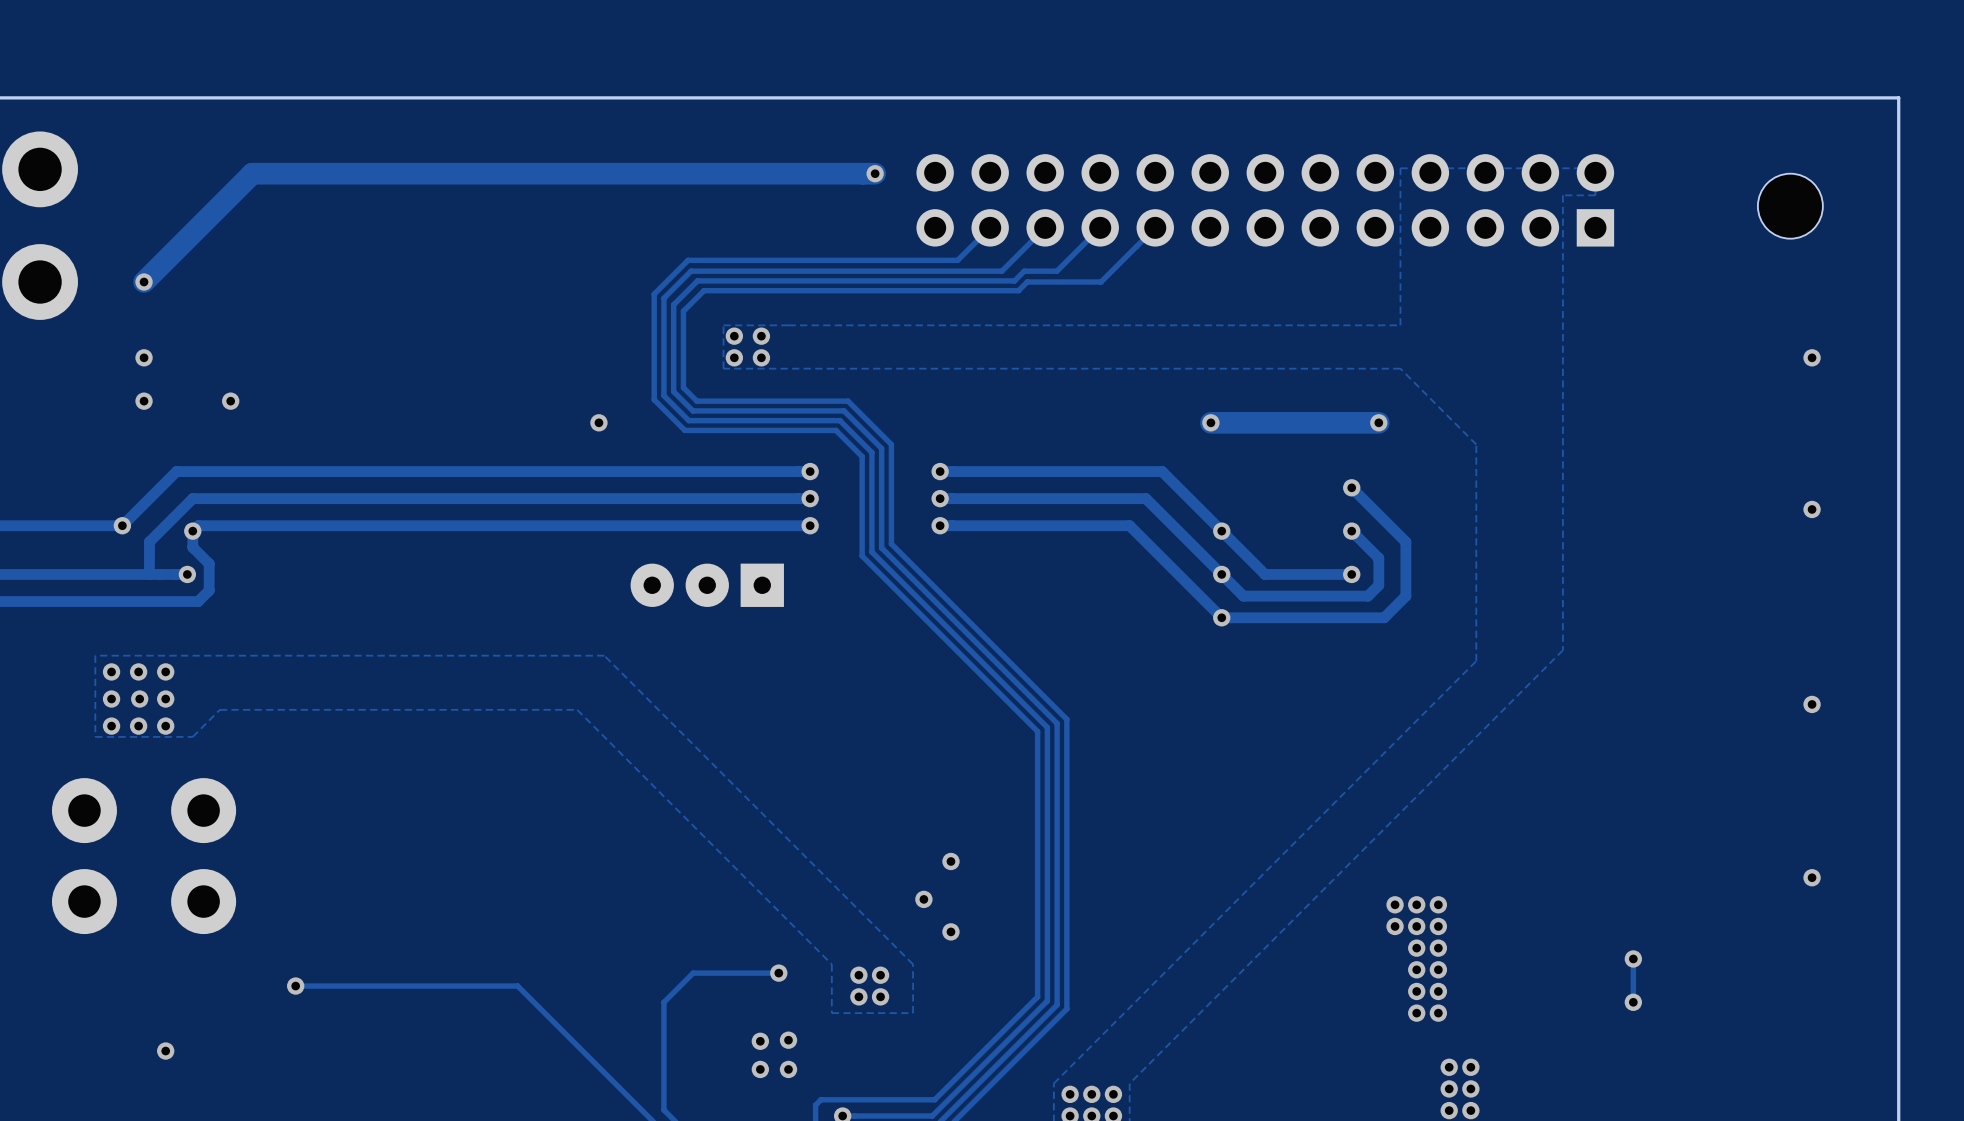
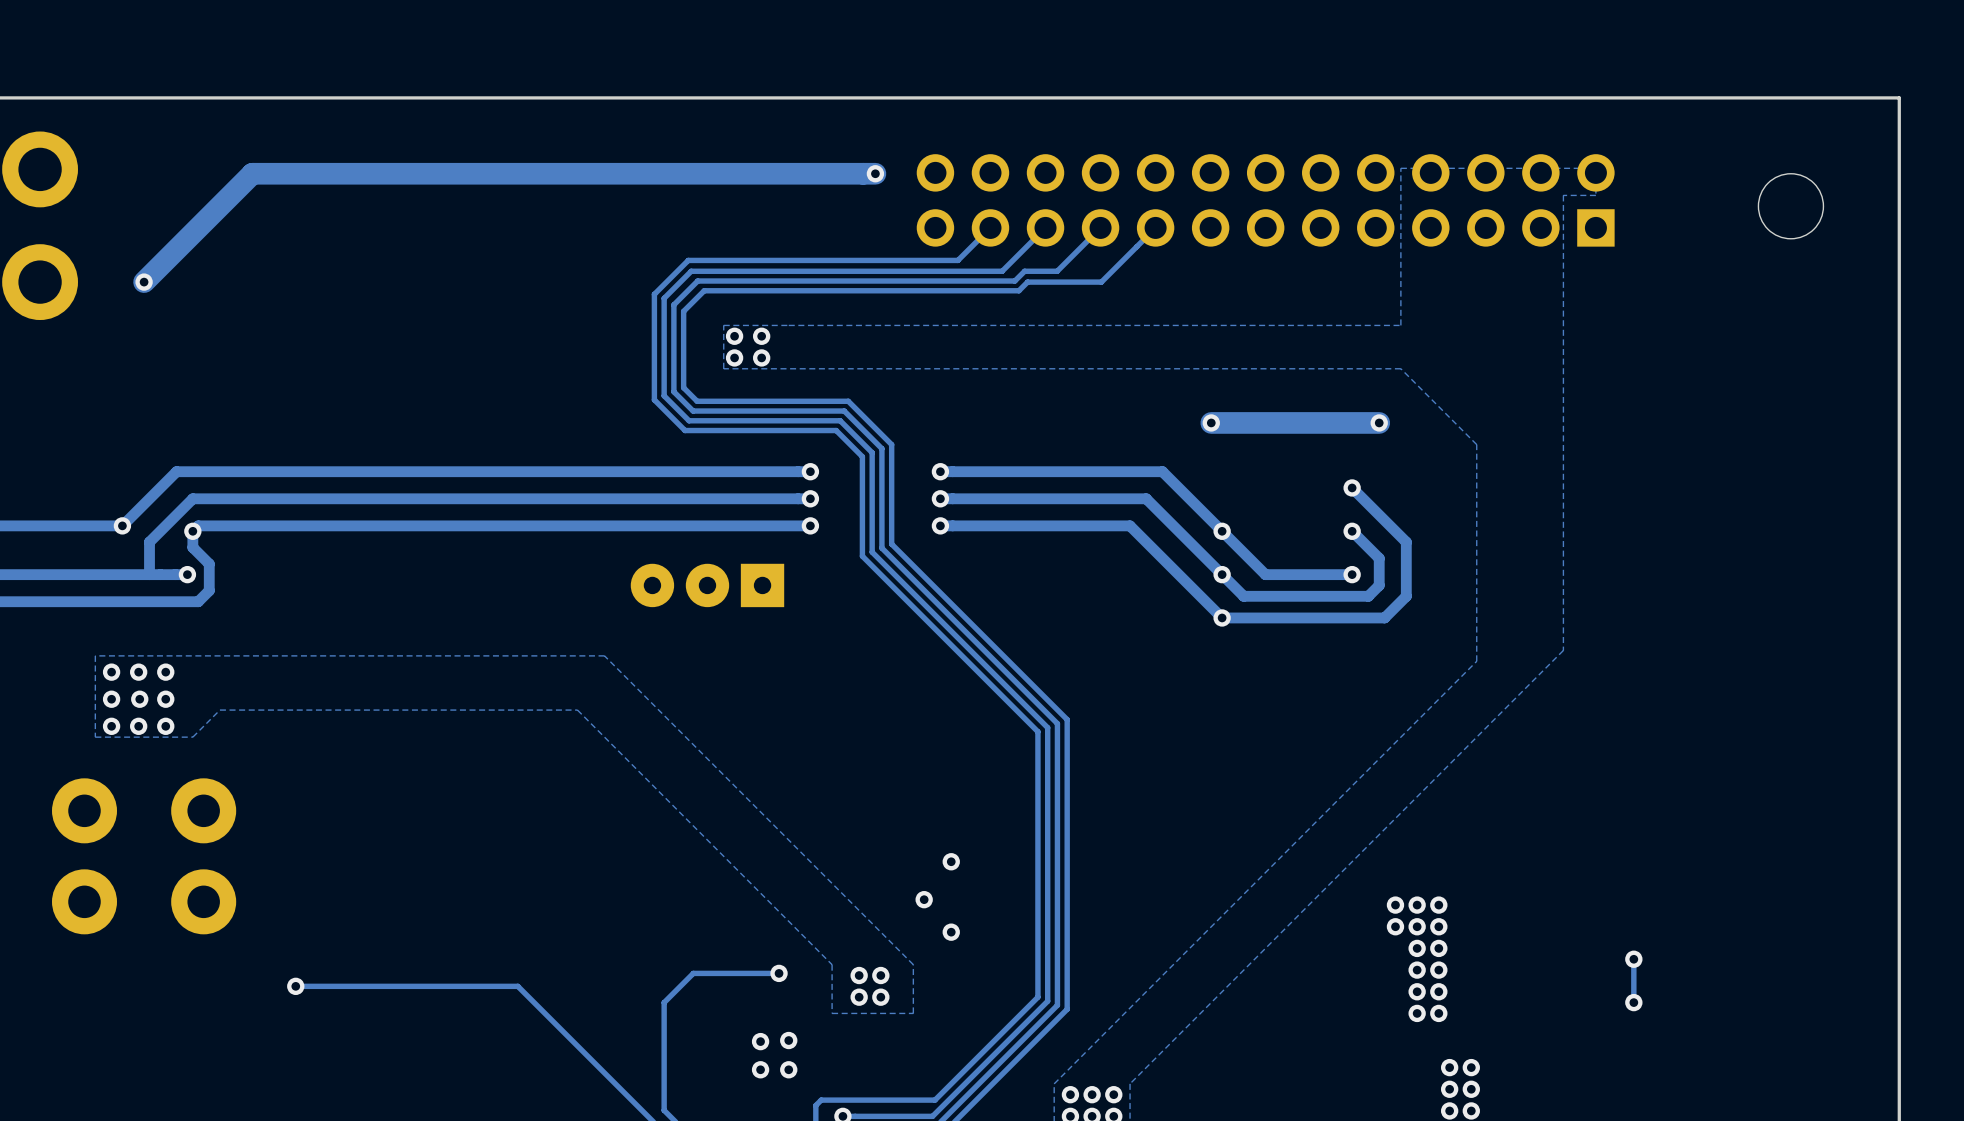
via: (144, 357) -> none
via: (1812, 357) -> none
via: (144, 401) -> none
via: (230, 401) -> none
via: (598, 422) -> none
via: (1812, 509) -> none
via: (1812, 704) -> none
via: (1812, 877) -> none
via: (165, 1051) -> none

